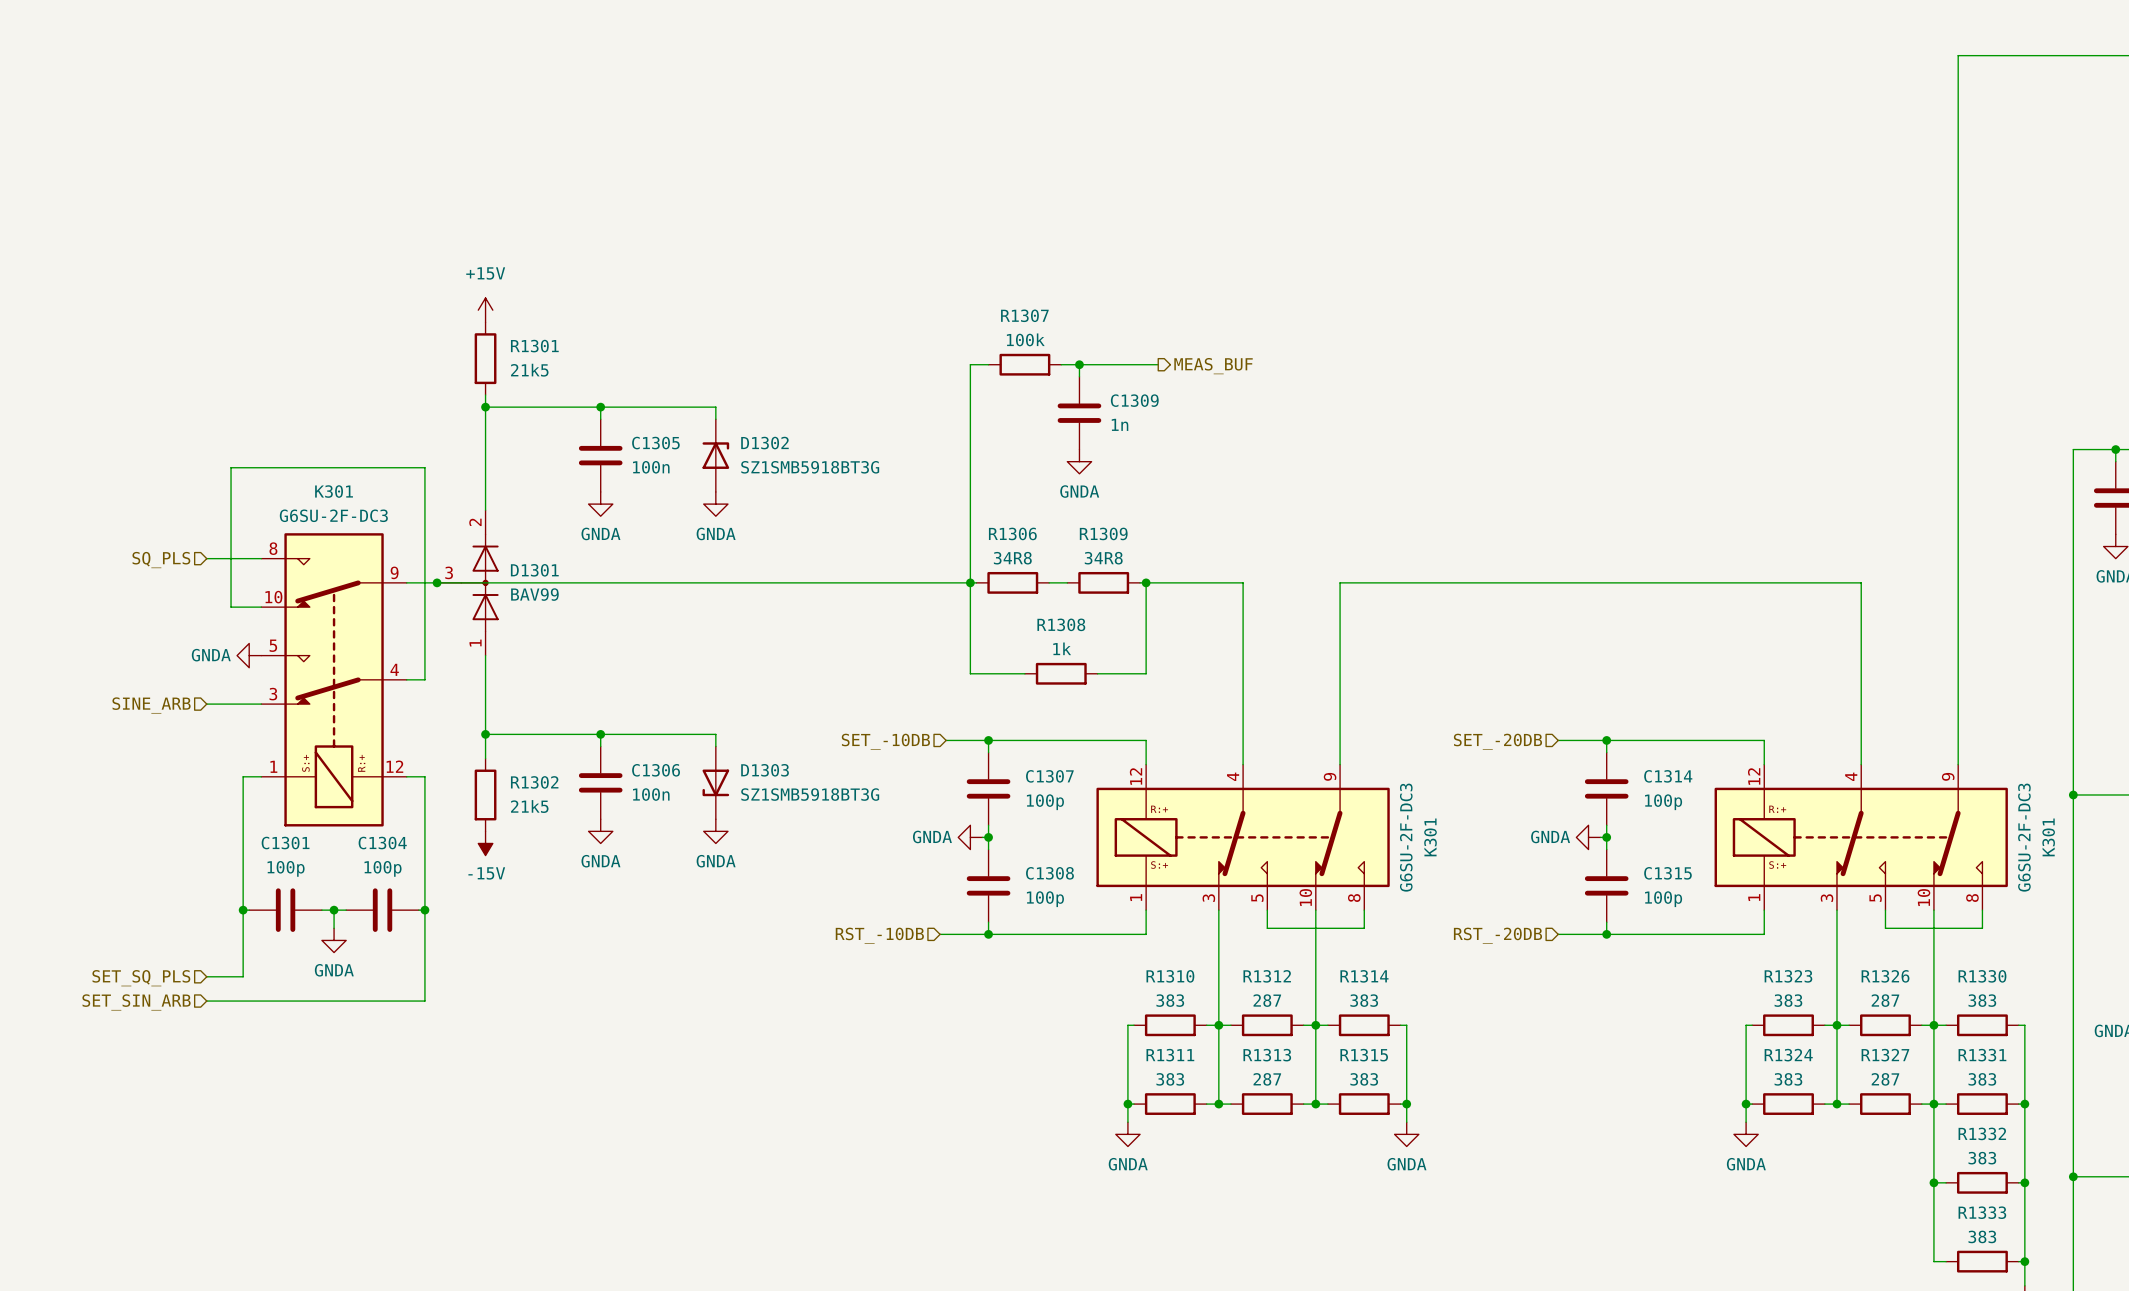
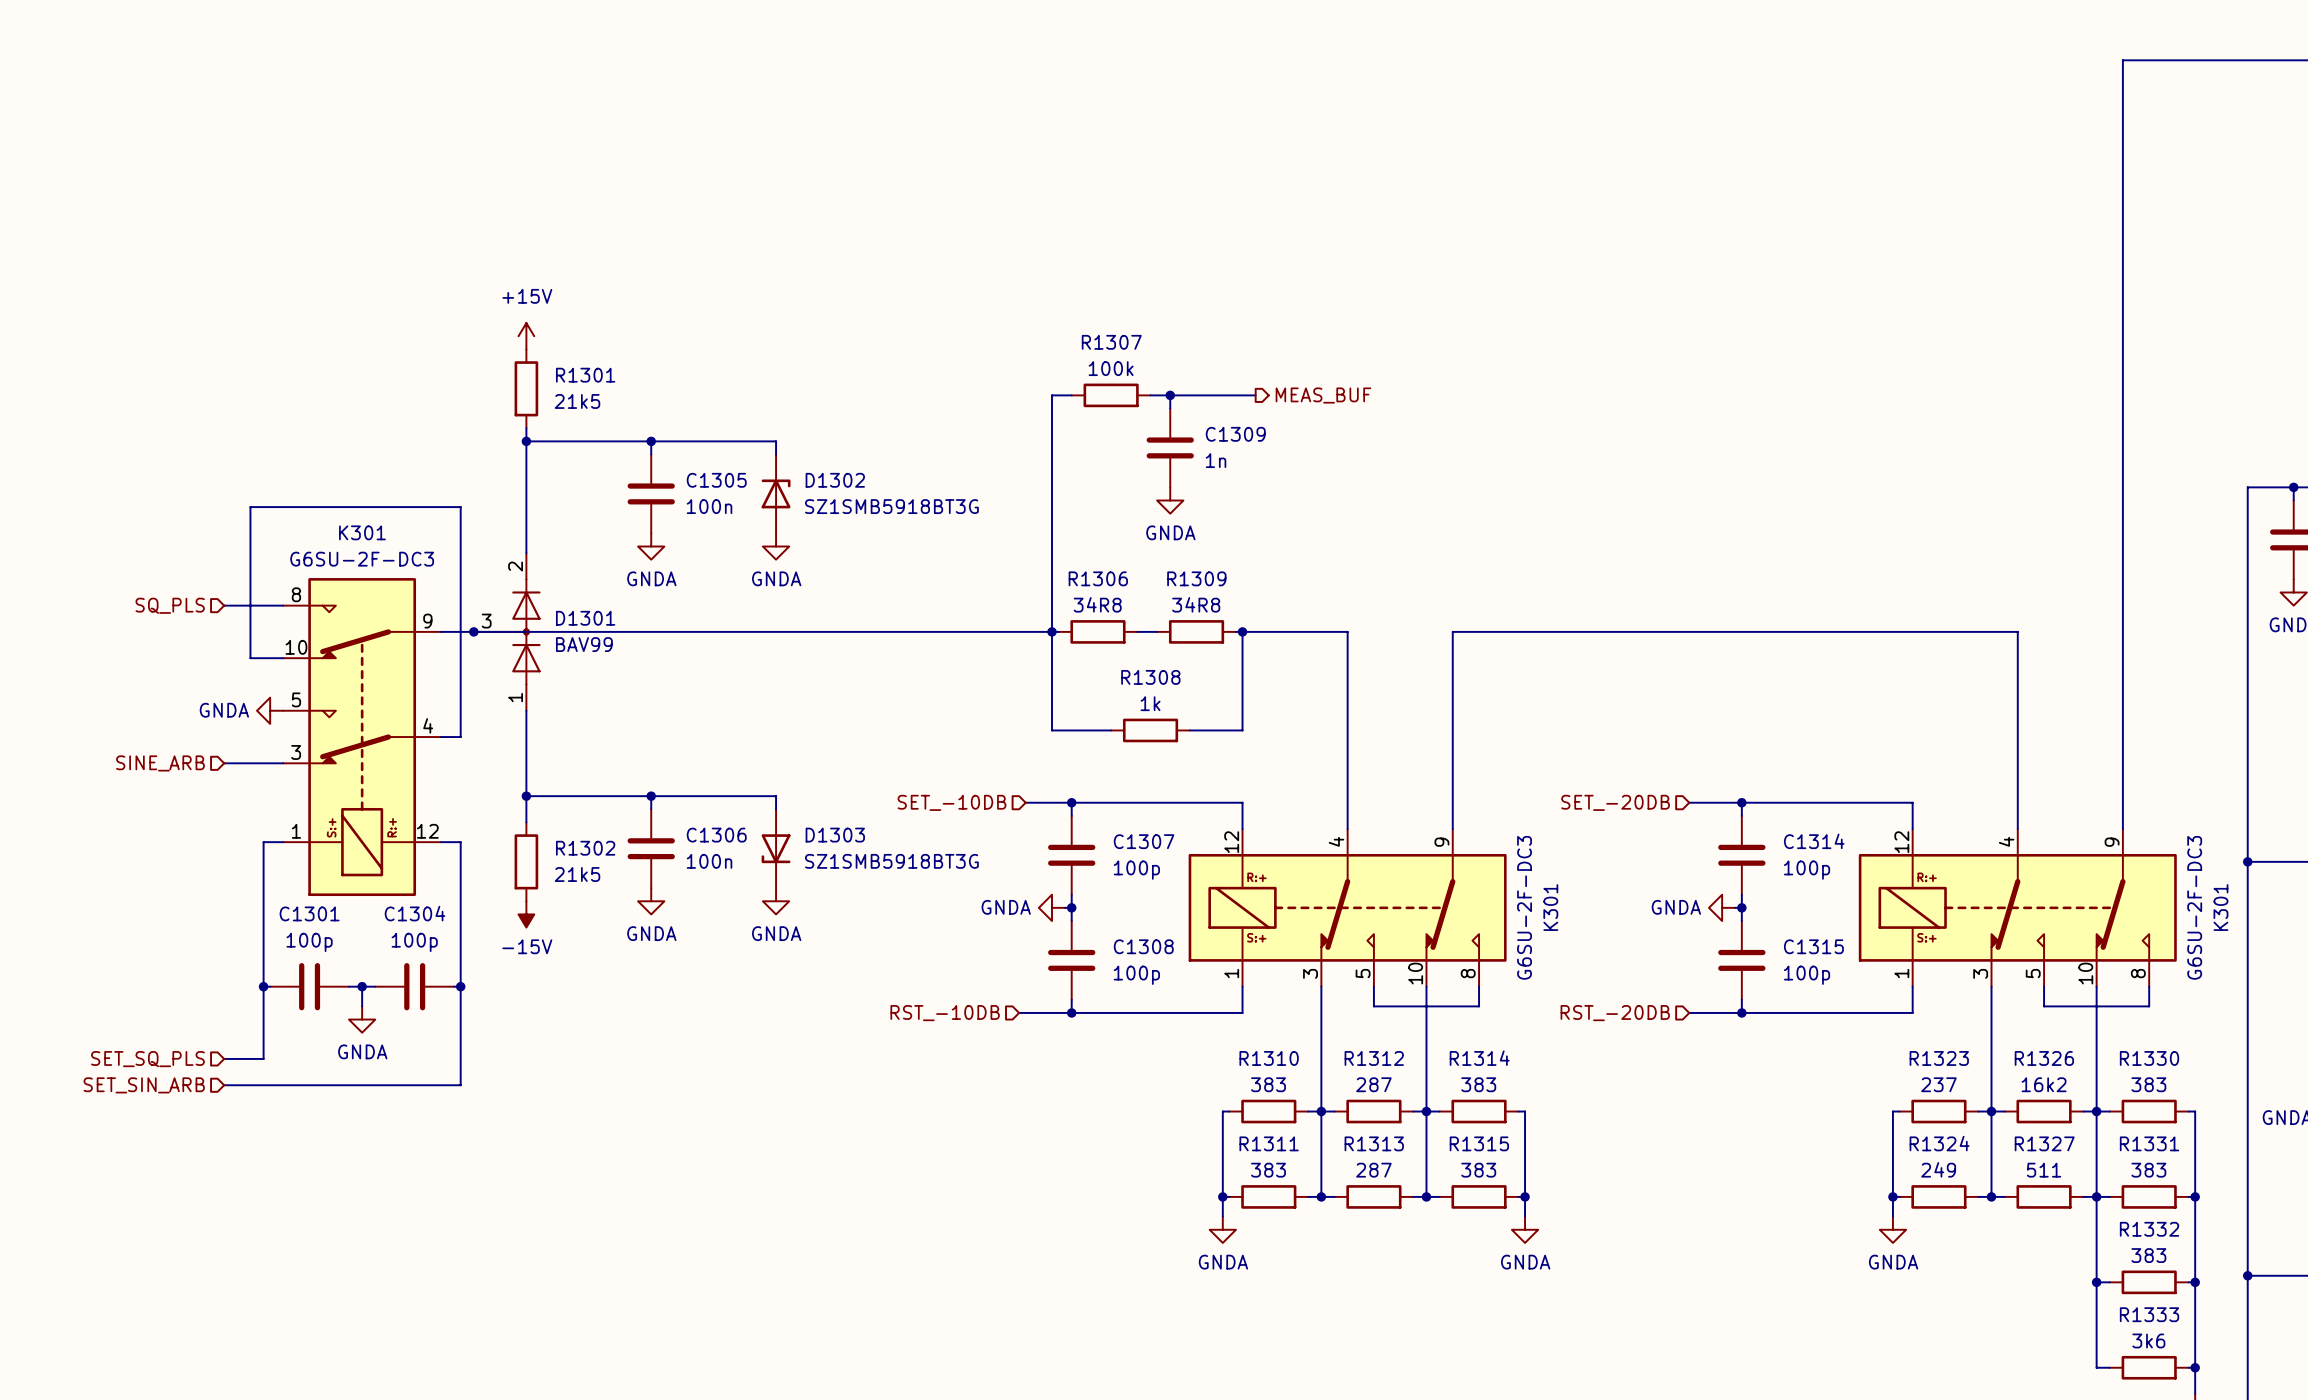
R1323 value: 383 (1788, 1000) -> 237 (1938, 1084)
R1326 value: 287 (1885, 1000) -> 16k2 (2044, 1084)
R1324 value: 383 (1788, 1079) -> 249 (1938, 1169)
R1327 value: 287 (1885, 1079) -> 511 (2044, 1170)
R1333 value: 383 (1982, 1236) -> 3k6 (2148, 1340)

